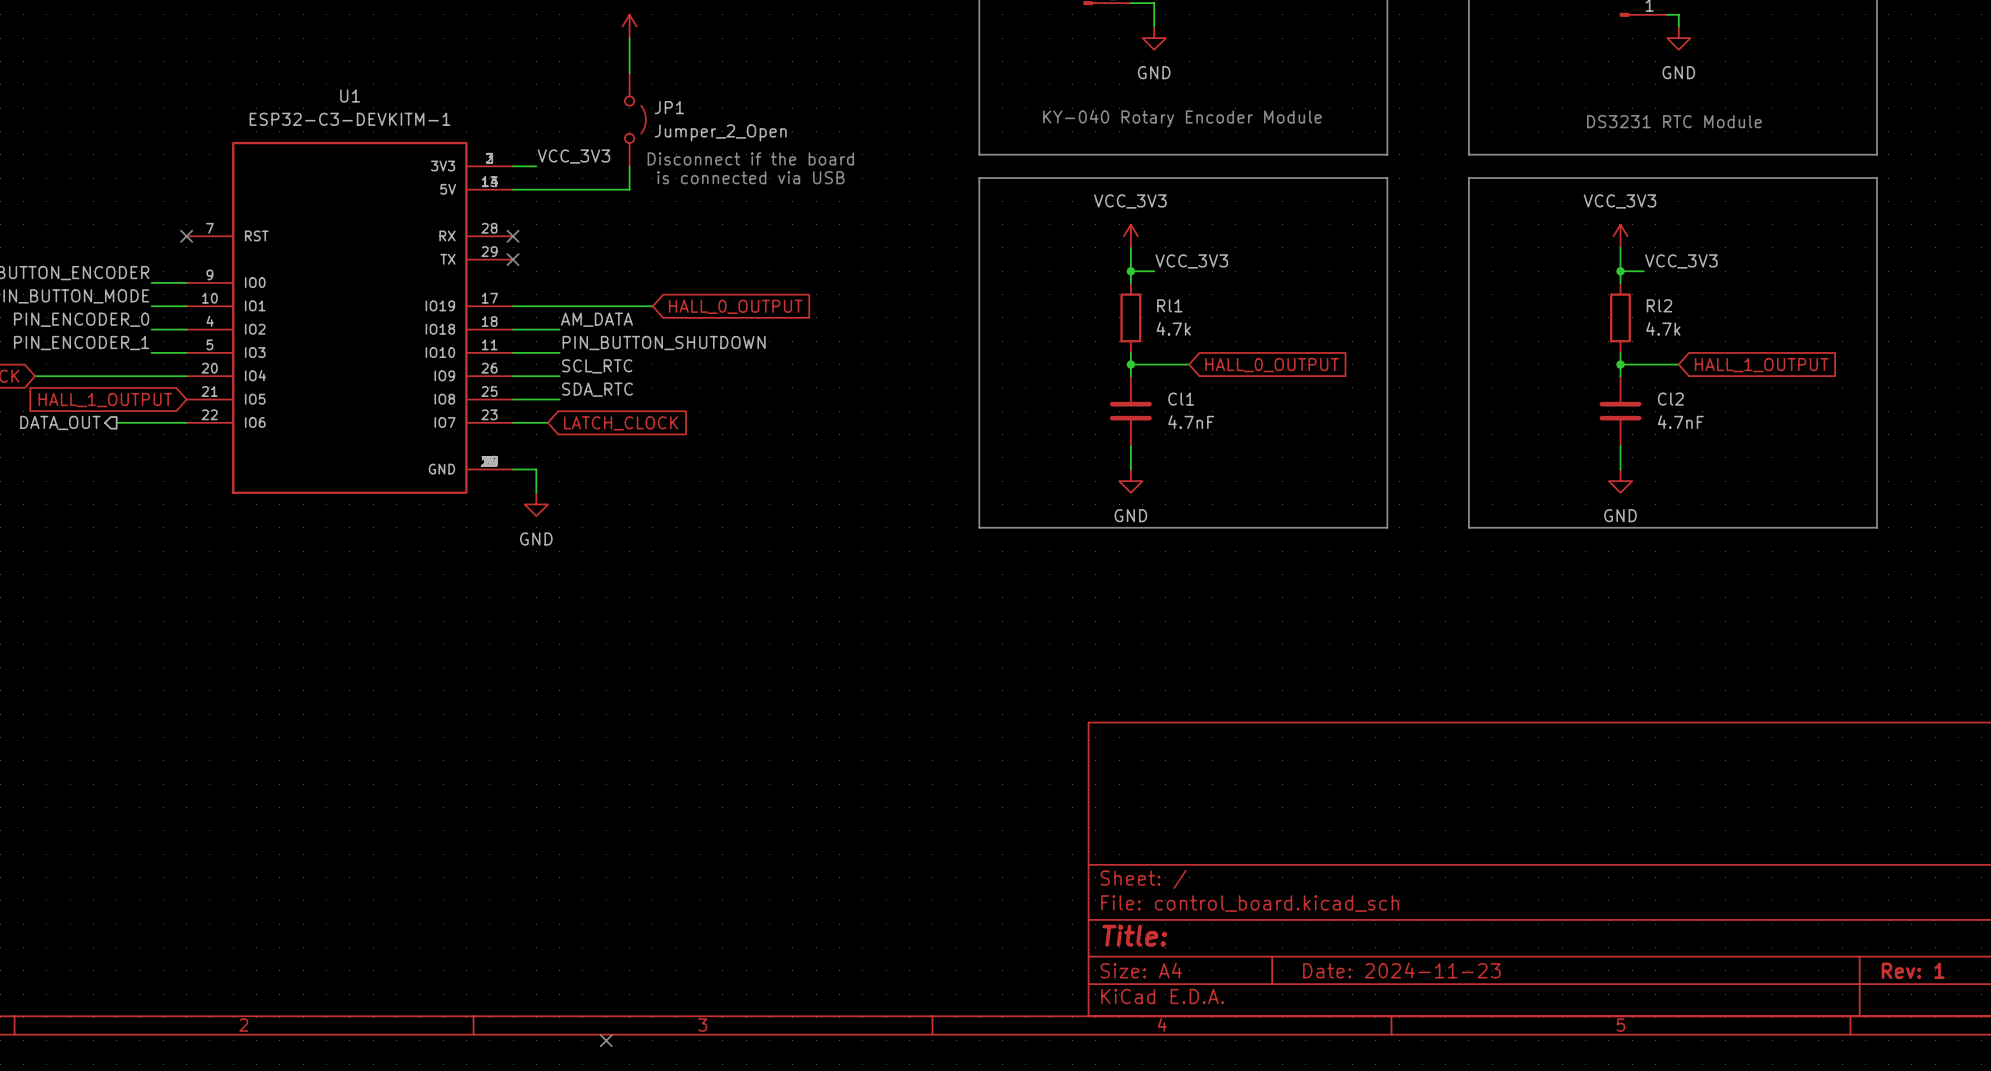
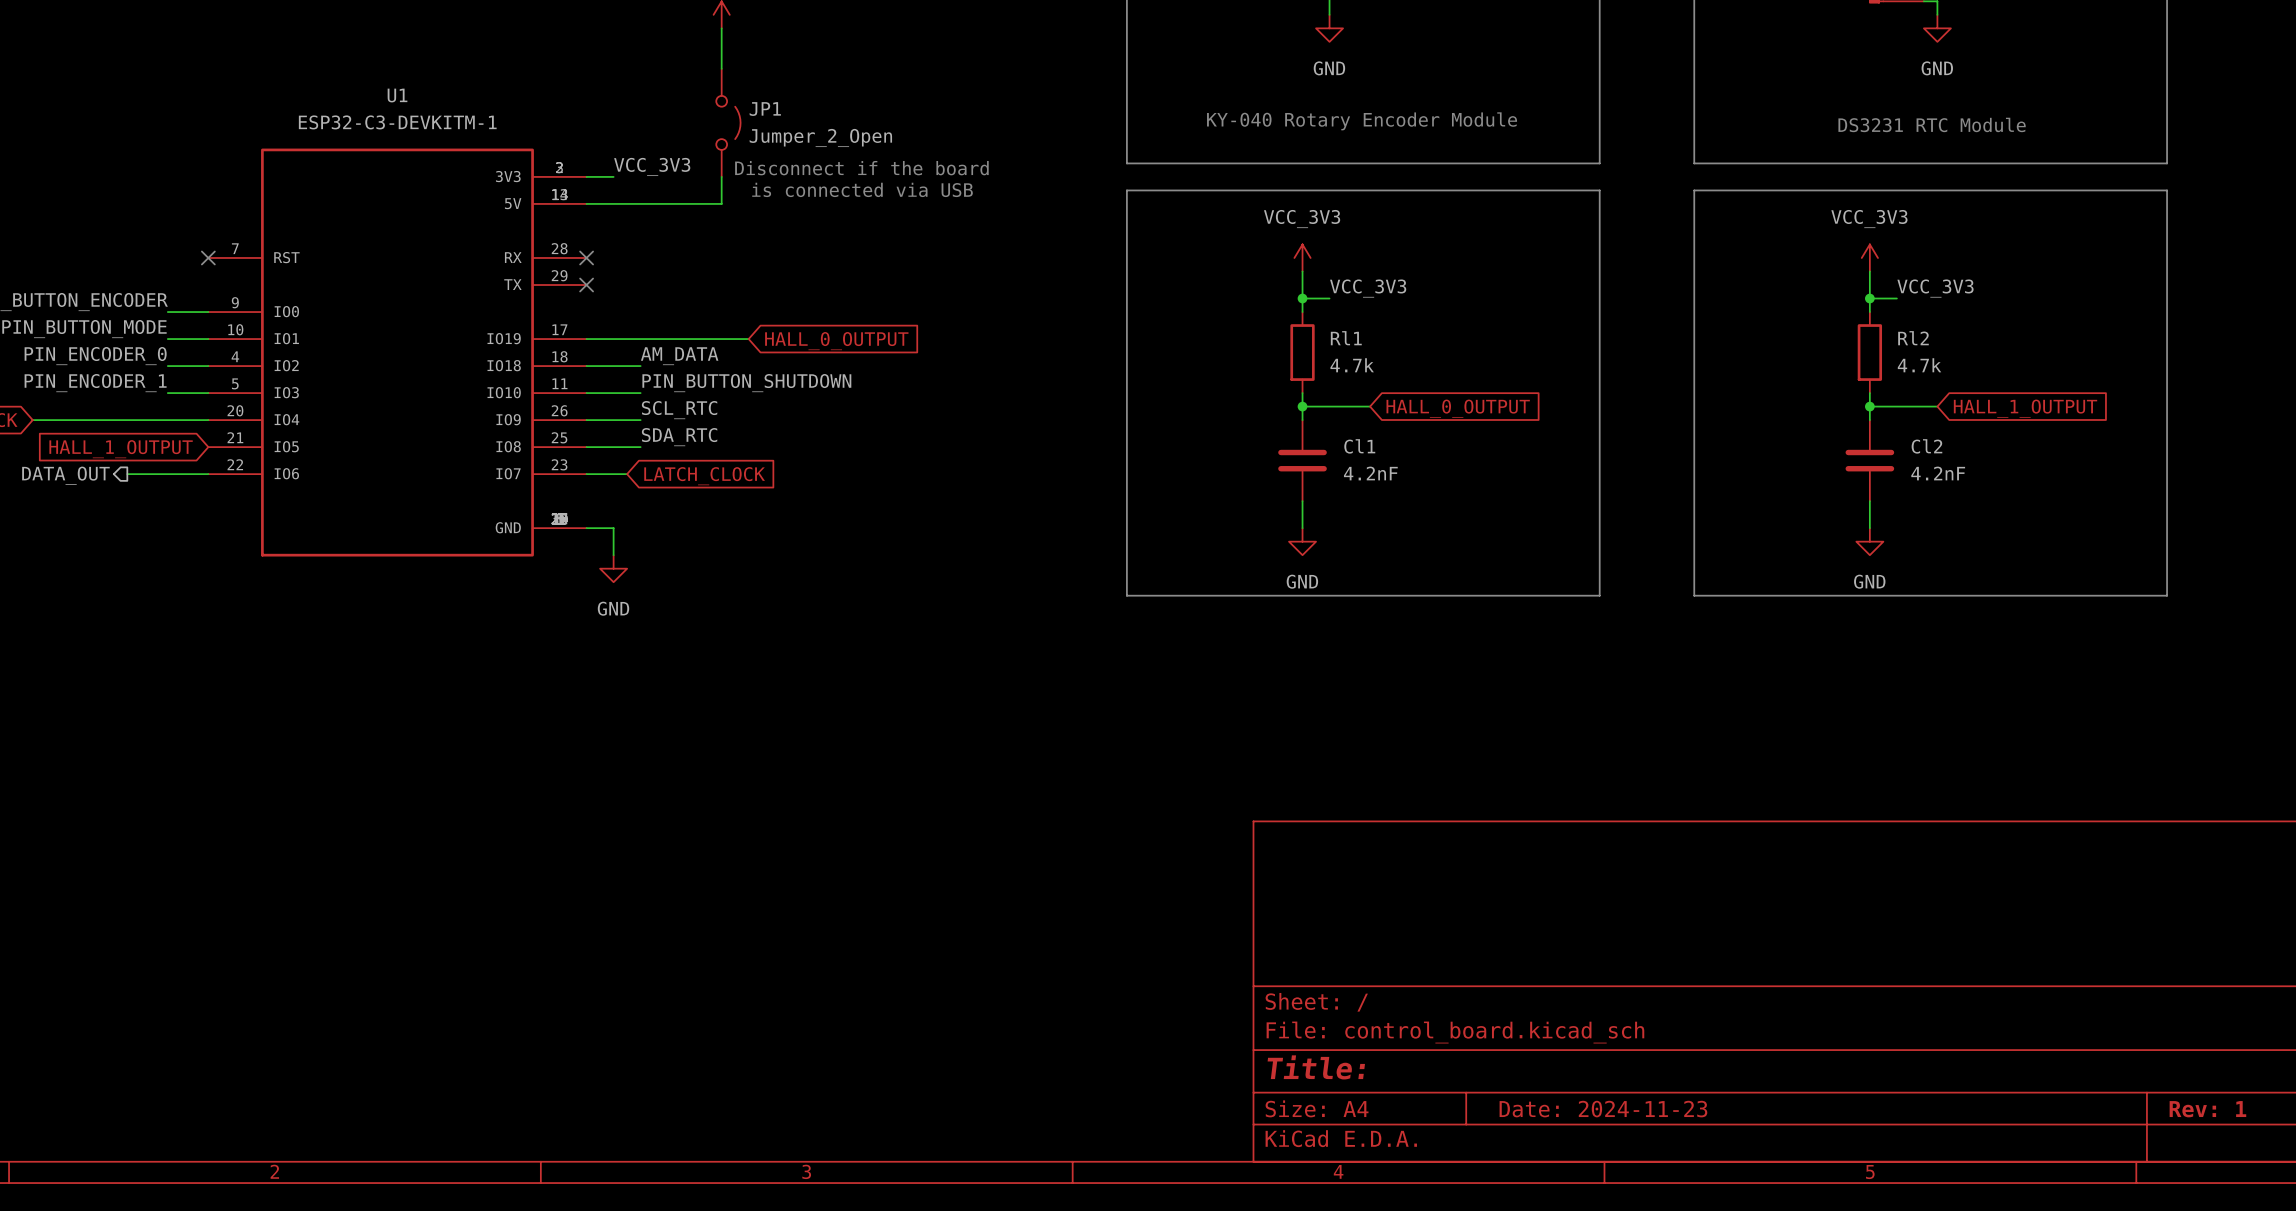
Cl1 value: 4.7nF (1191, 422) -> 4.2nF (1370, 473)
Cl2 value: 4.7nF (1680, 422) -> 4.2nF (1938, 473)
no-connect mark: (606, 1040) -> none

